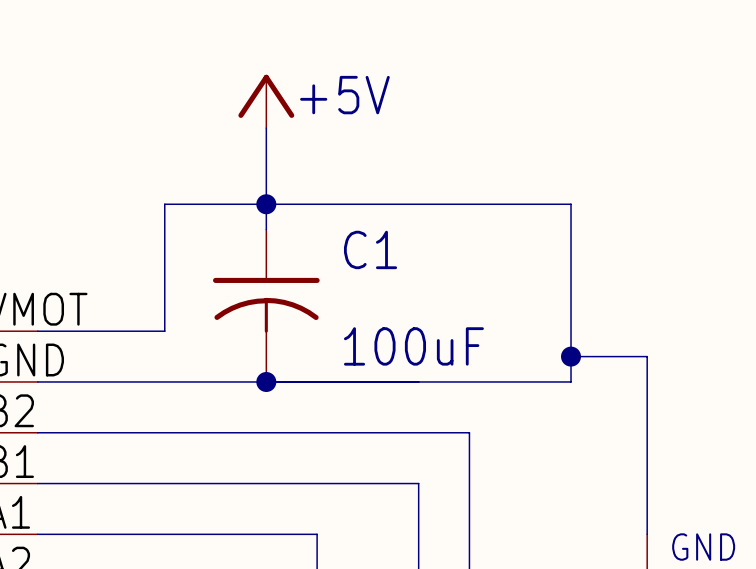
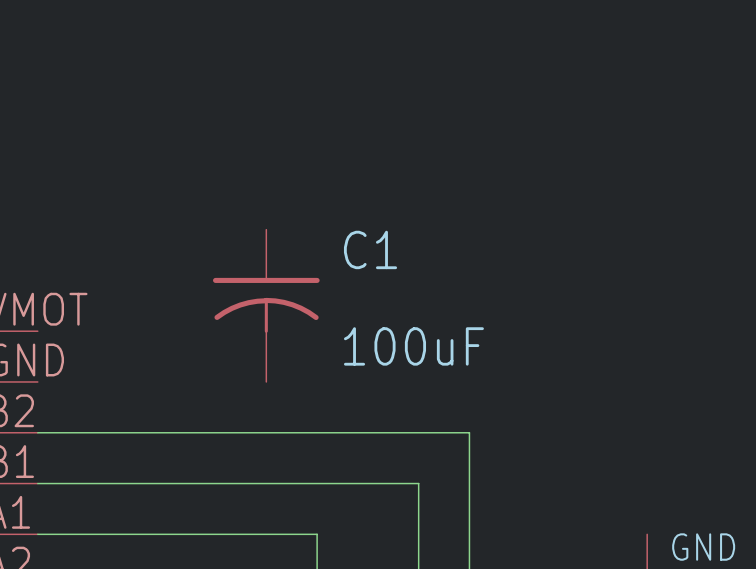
power symbol: +5V (266, 101) -> none
wire: (266, 128) (266, 229) -> none
junction: (266, 204) -> none
wire: (37, 331) (164, 331) (164, 204) (571, 204) (571, 381) (37, 381) -> none
wire: (571, 356) (647, 356) (647, 534) -> none
junction: (571, 356) -> none
junction: (266, 381) -> none

